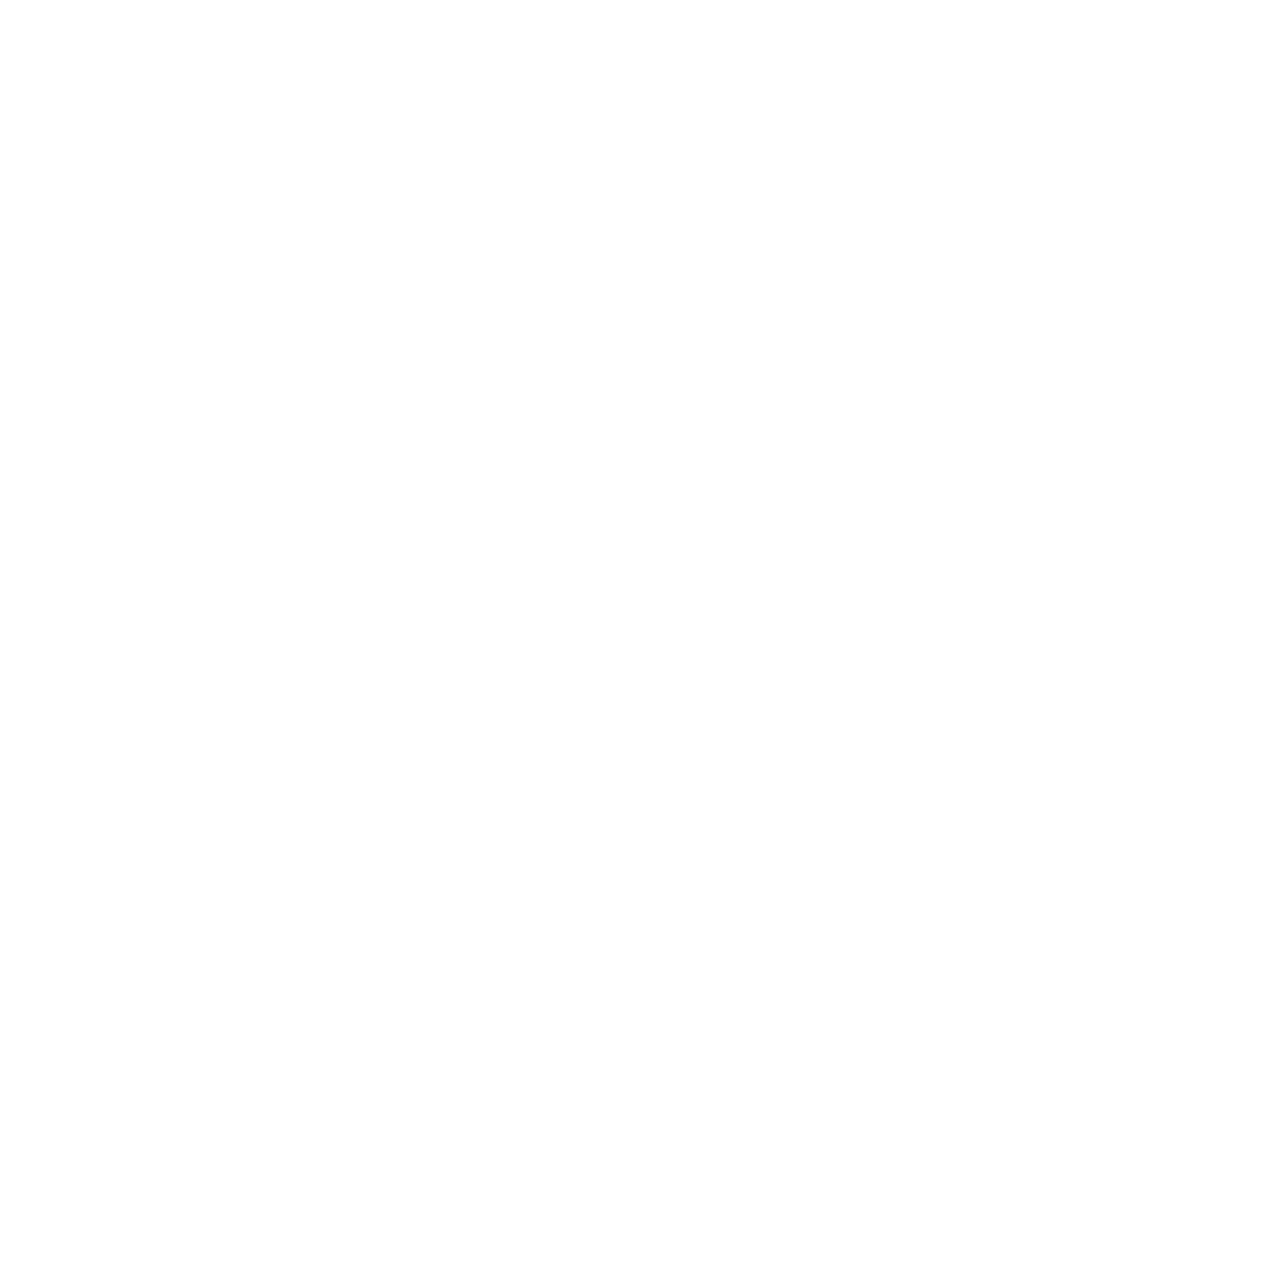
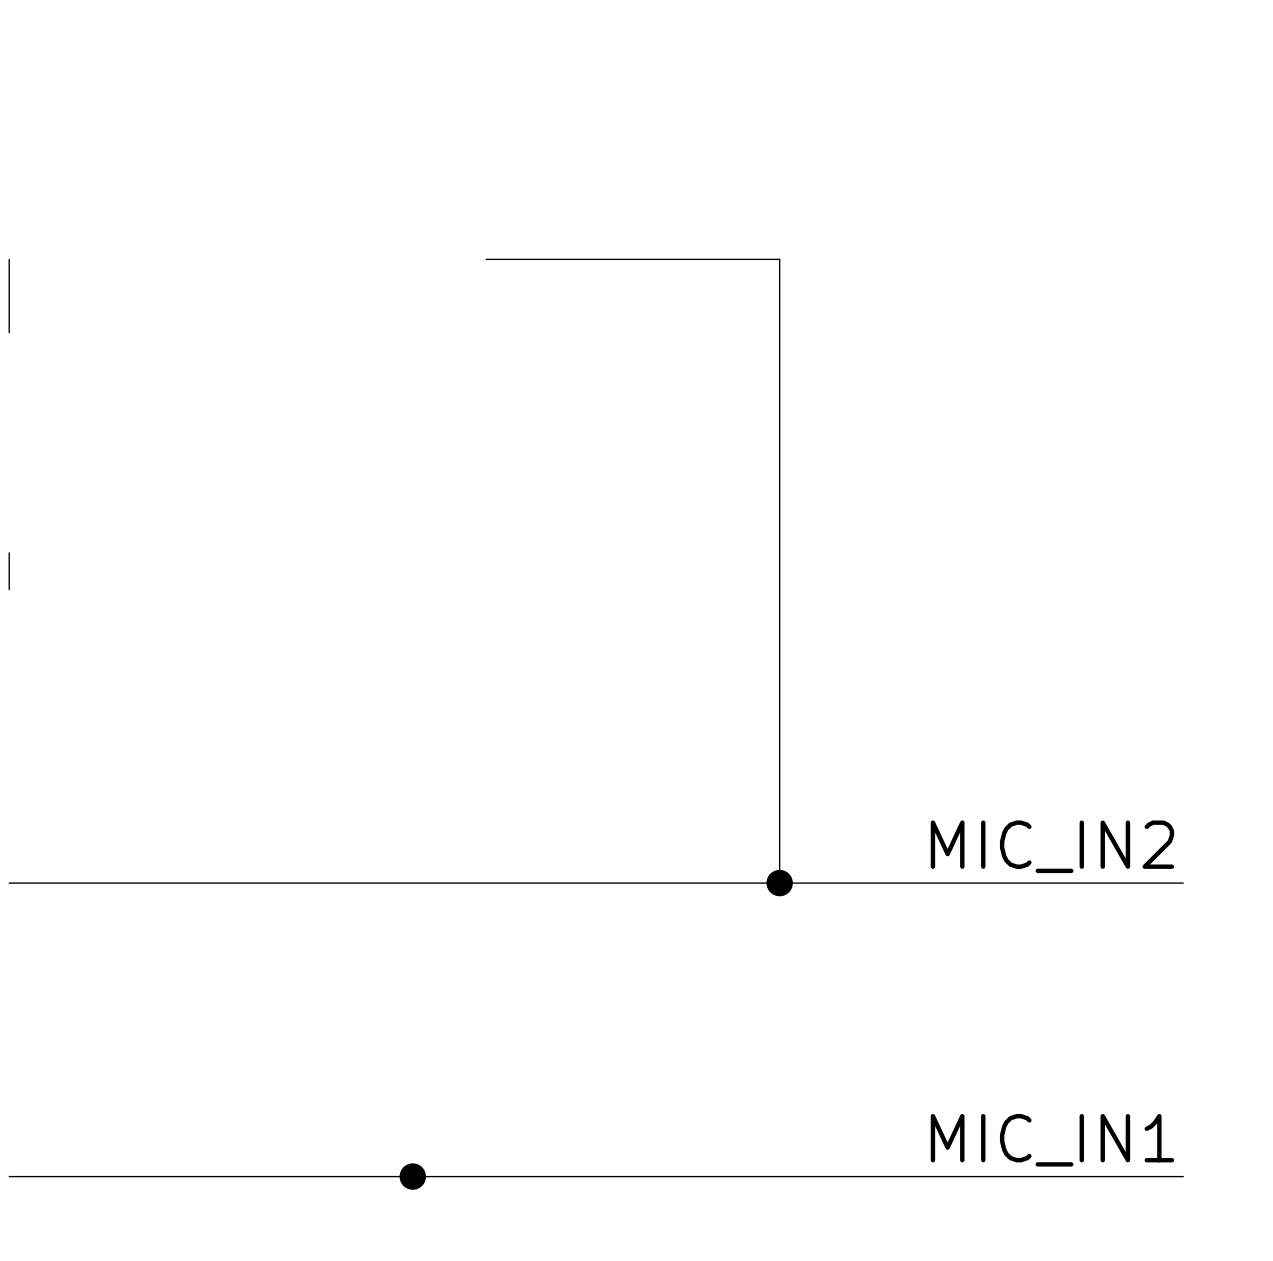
wire: none -> (9, 259) (9, 332)
wire: none -> (486, 259) (779, 259) (779, 883)
wire: none -> (9, 552) (9, 589)
label: none -> MIC_IN2 (1052, 846)
wire: none -> (9, 883) (1183, 883)
junction: none -> (779, 883)
label: none -> MIC_IN1 (1052, 1140)
wire: none -> (9, 1176) (1183, 1176)
junction: none -> (412, 1176)

